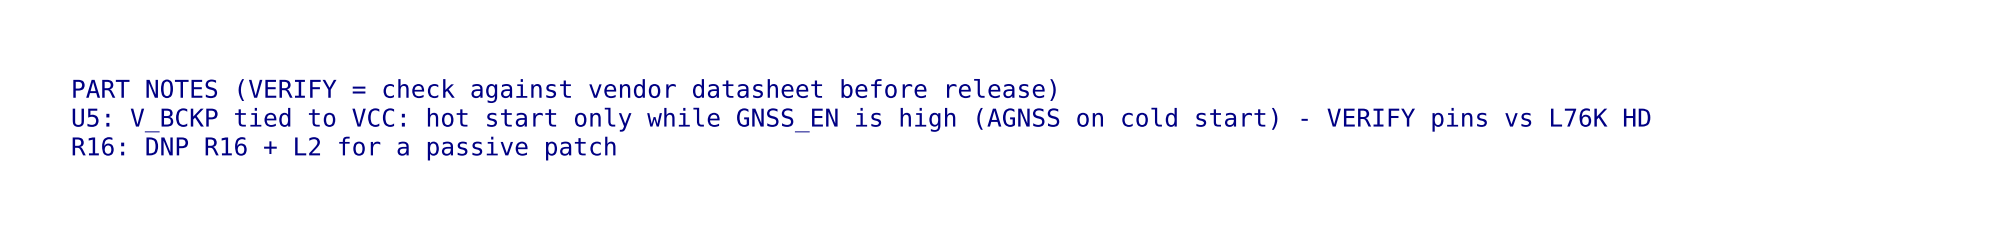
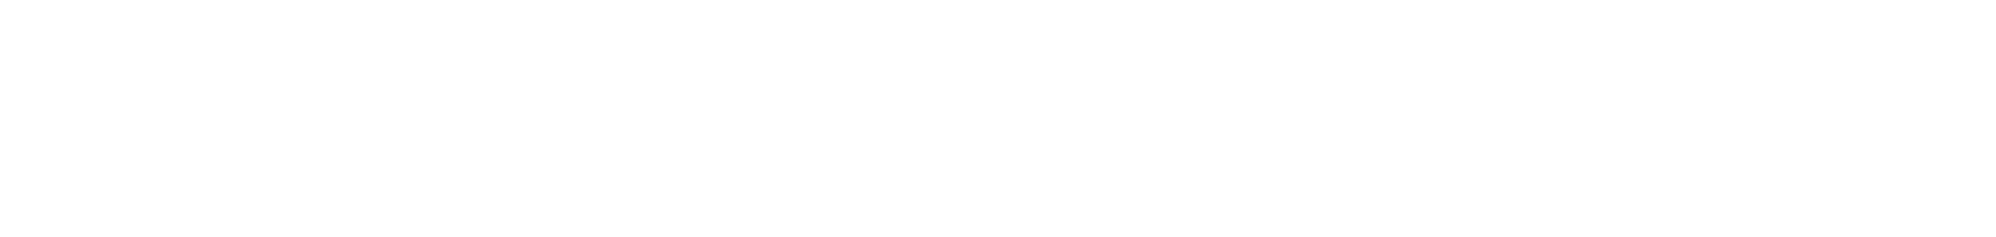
text: PART NOTES (VERIFY = check against vendor datasheet before release) (564, 91) -> none
text: U5: V_BCKP tied to VCC: hot start only while GNSS_EN is high (AGNSS on cold start) - VERIFY pins vs L76K HD (861, 120) -> none
text: R16: DNP R16 + L2 for a passive patch (344, 148) -> none

